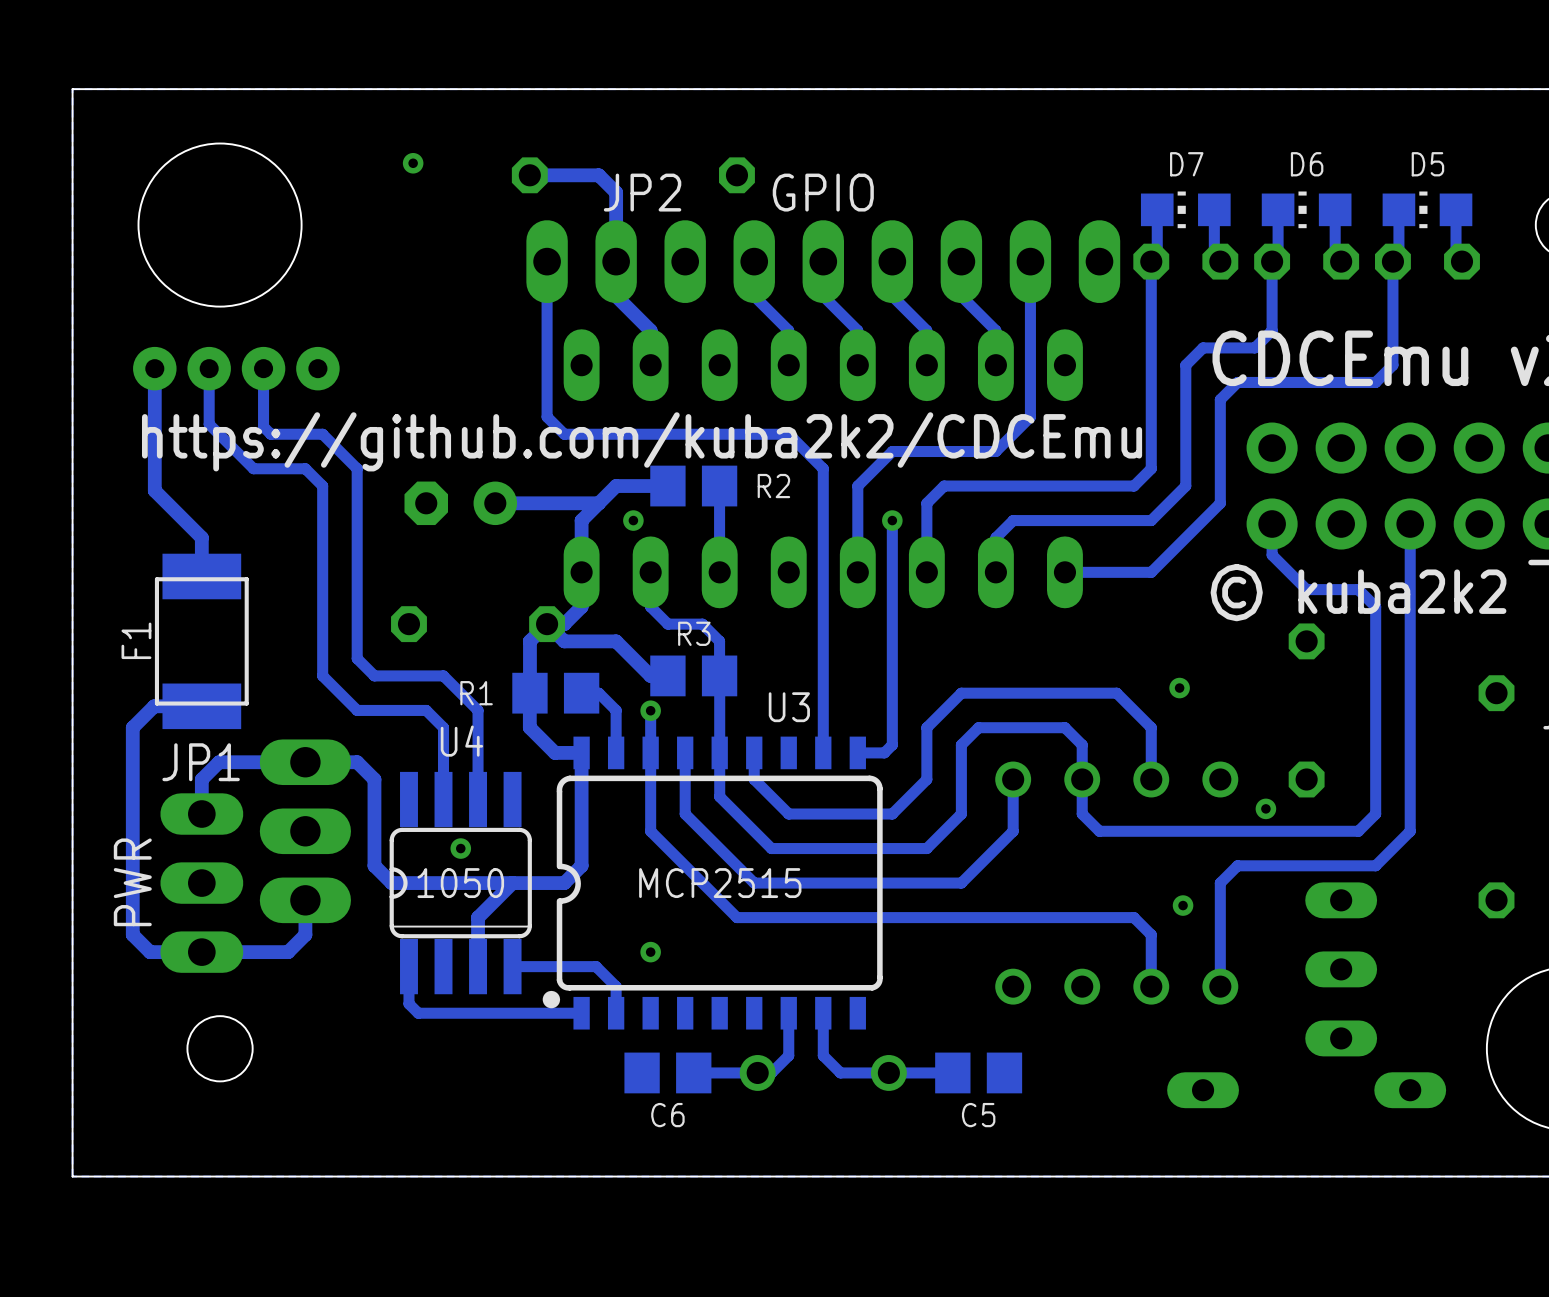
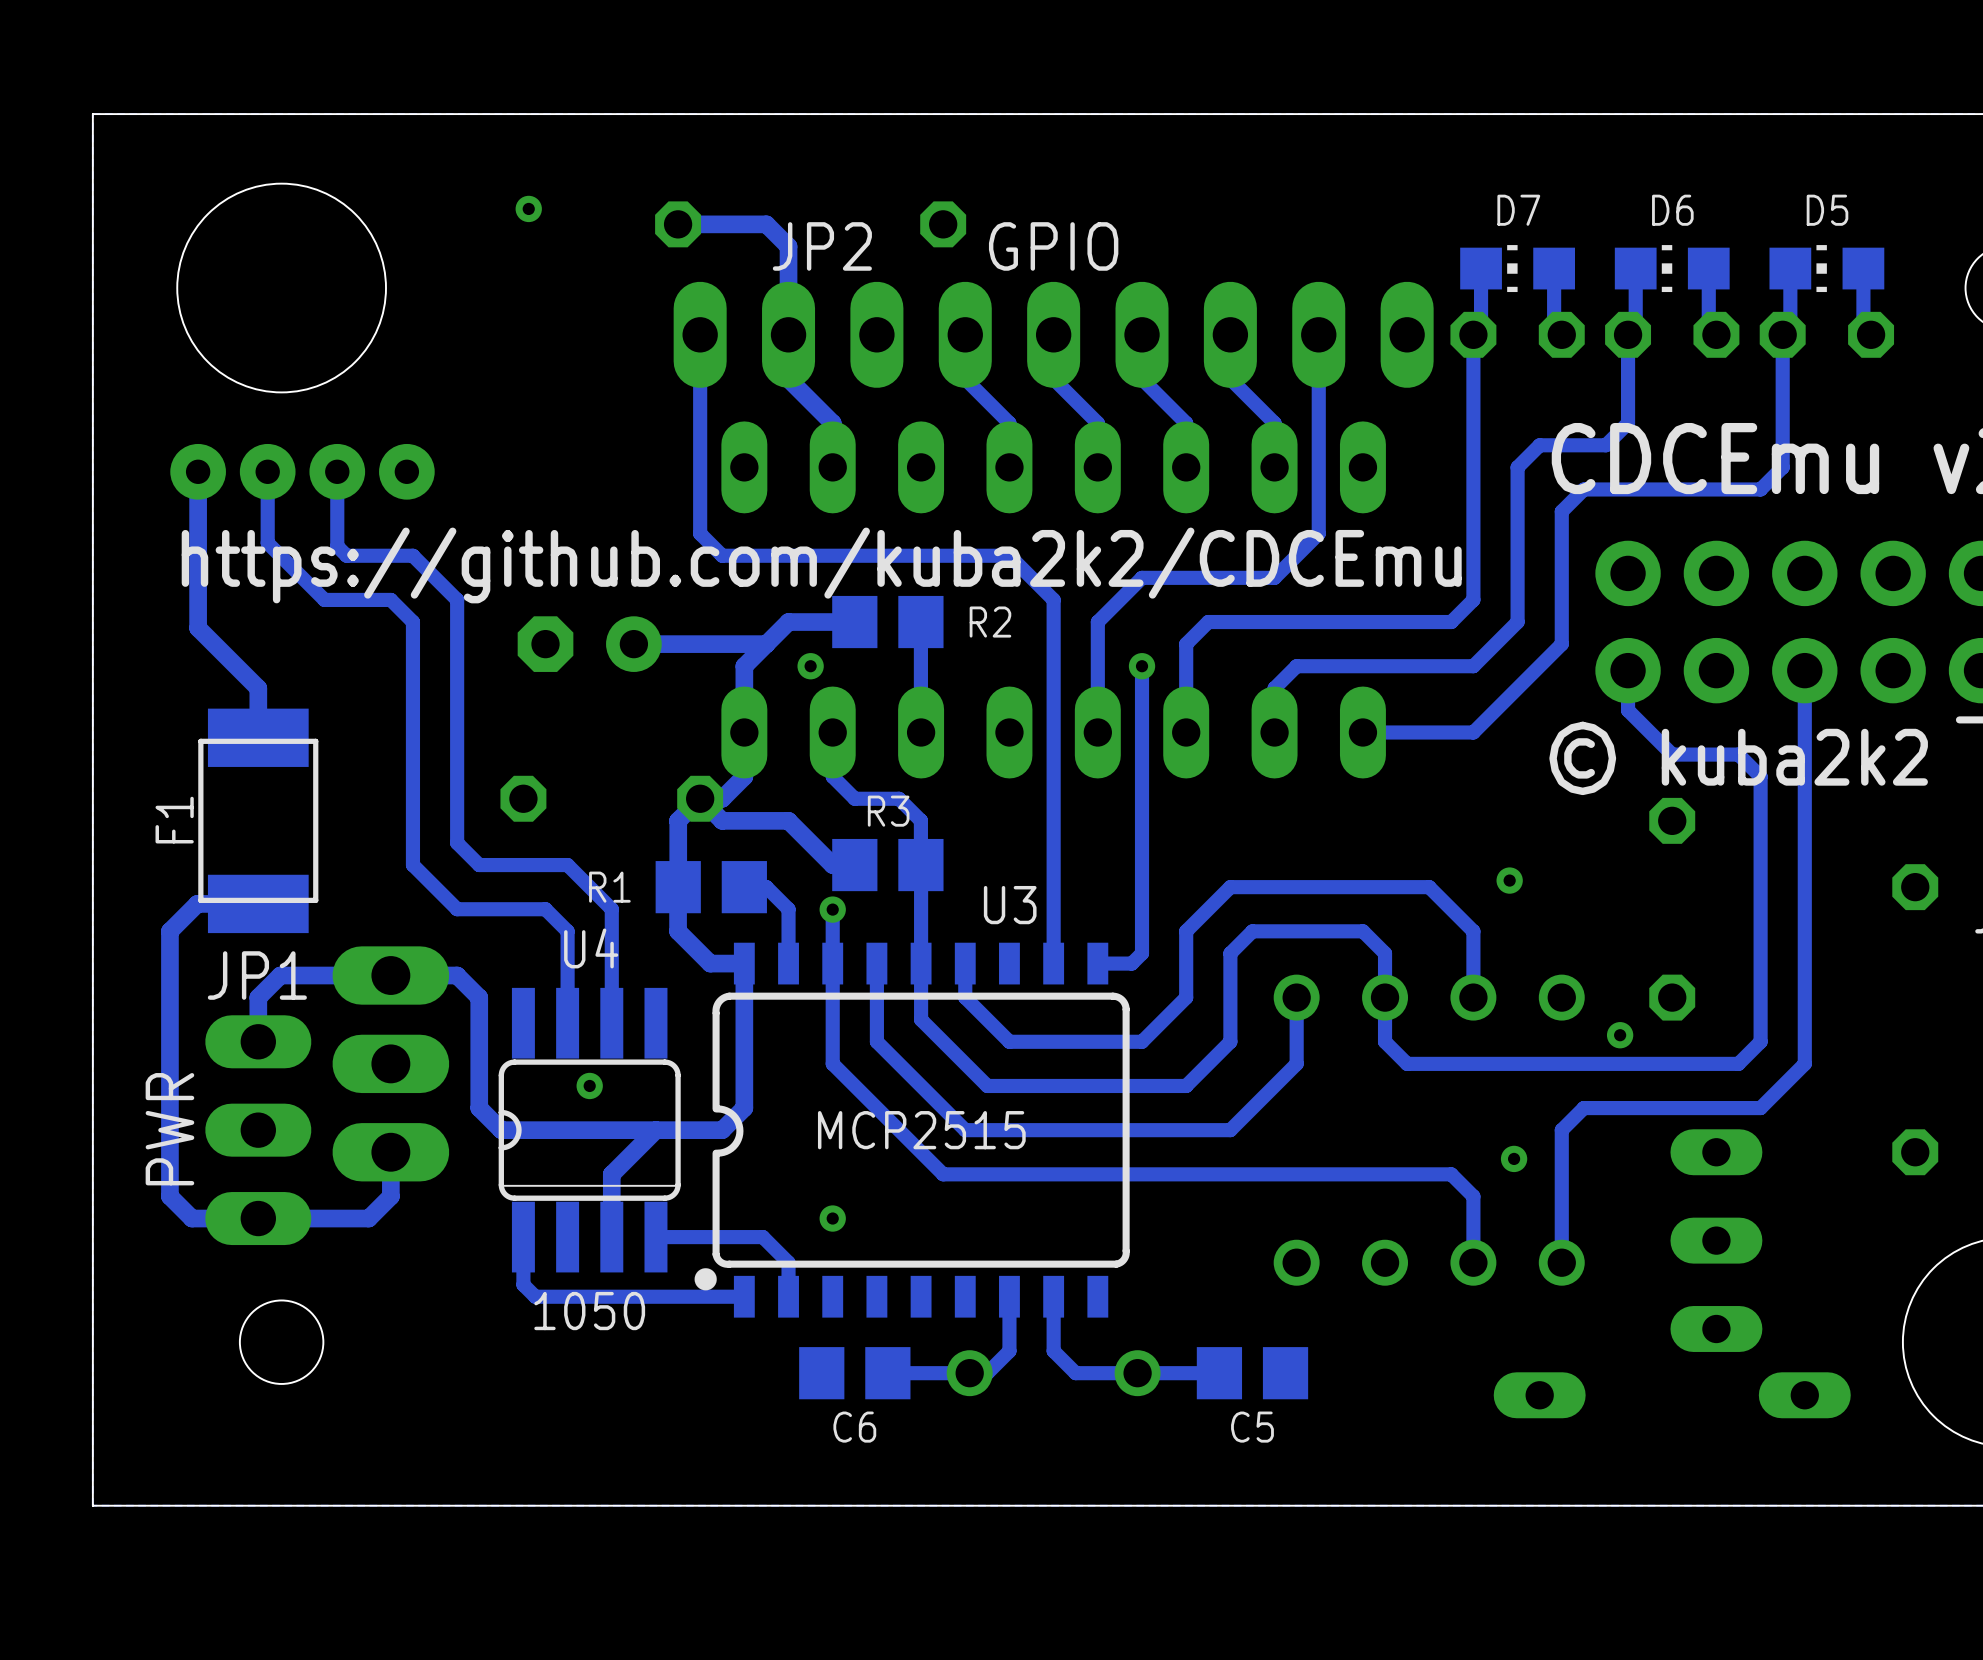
U4 value position: 1050 (460, 883) -> 1050 (589, 1311)

